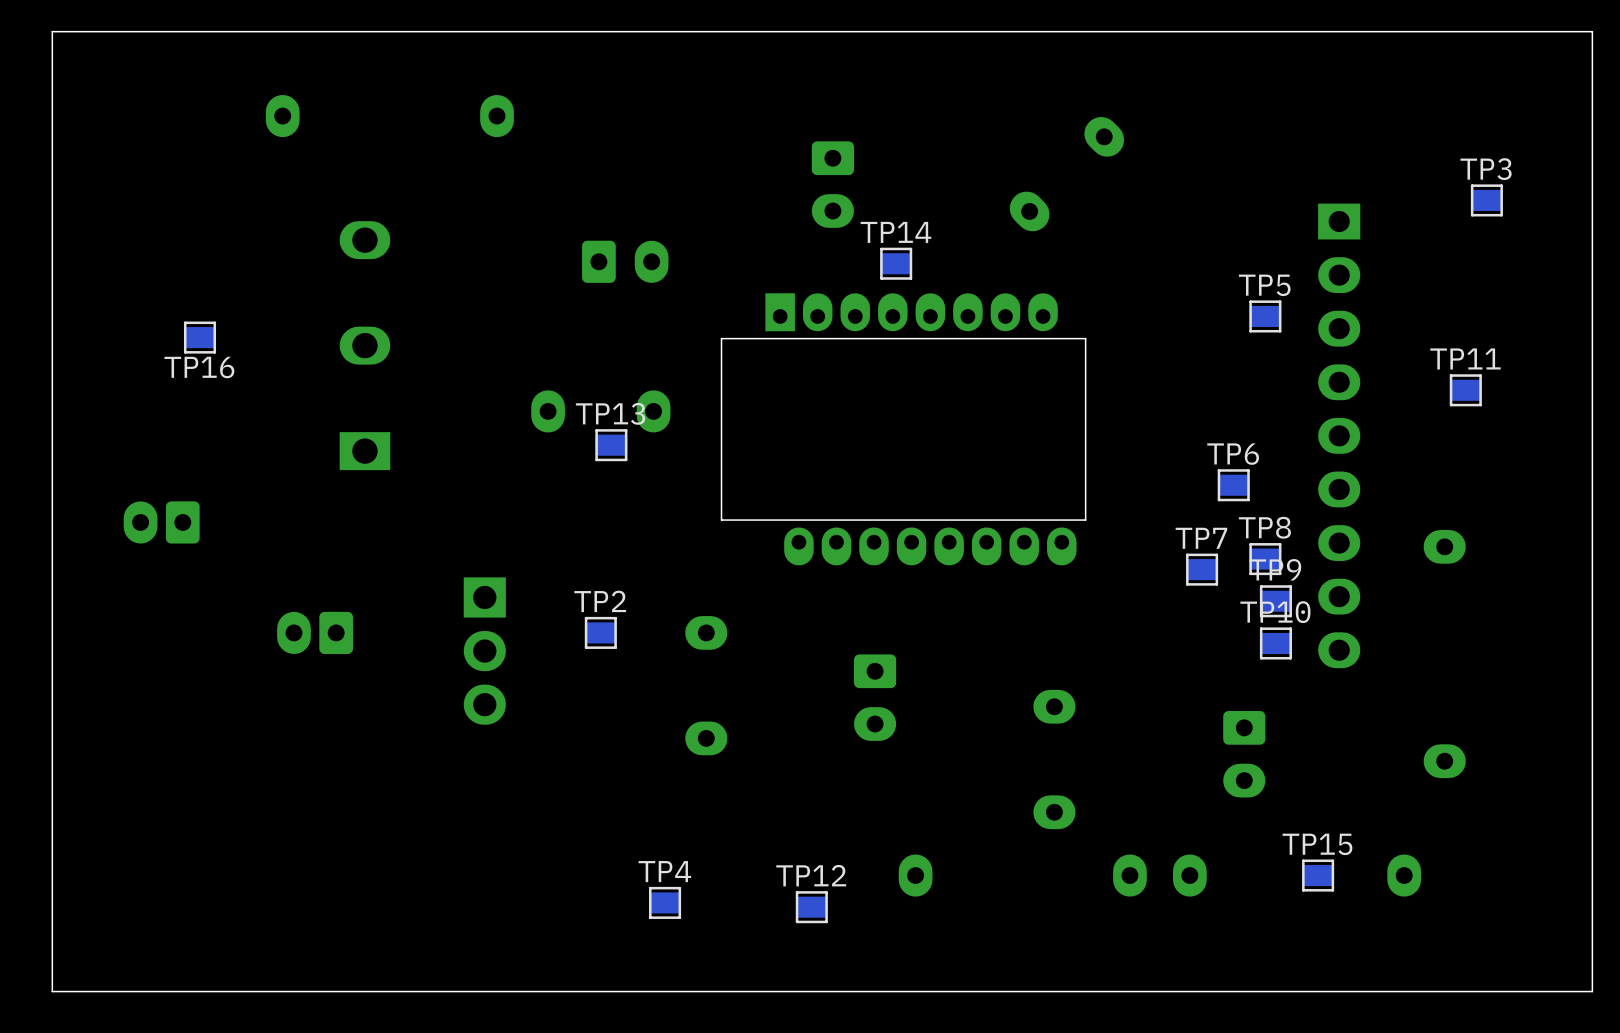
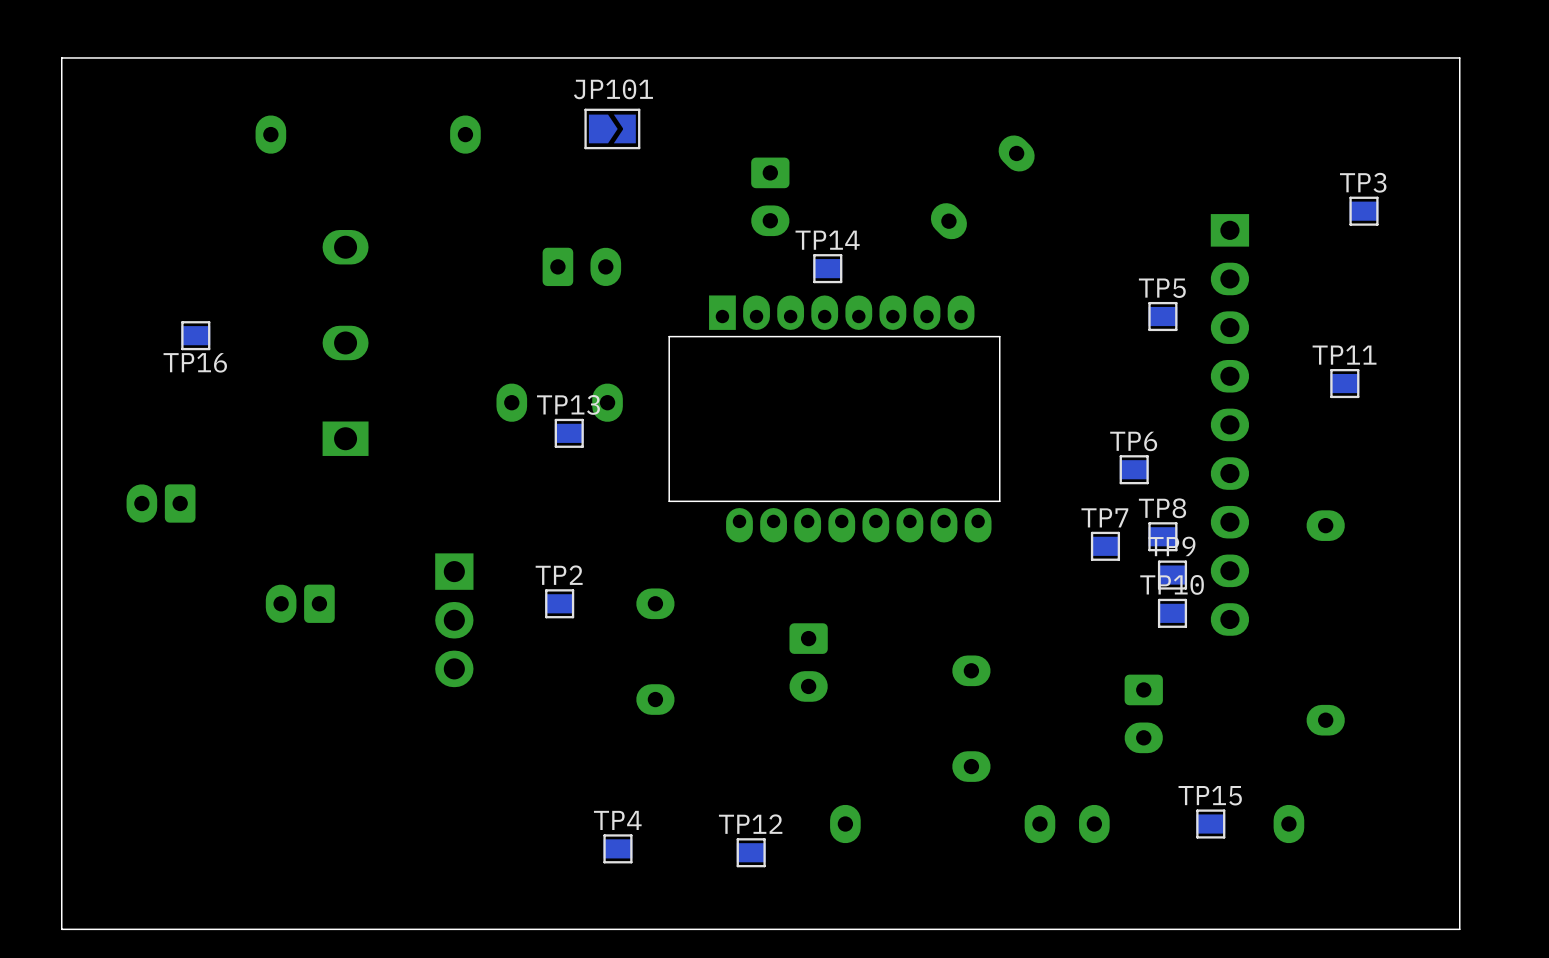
JP101: none -> (612, 128)

